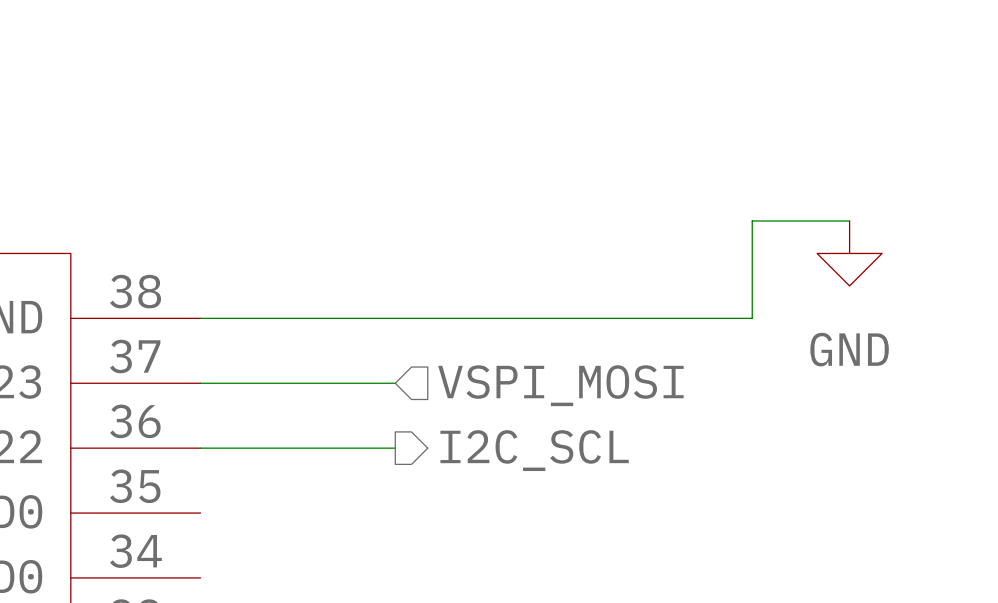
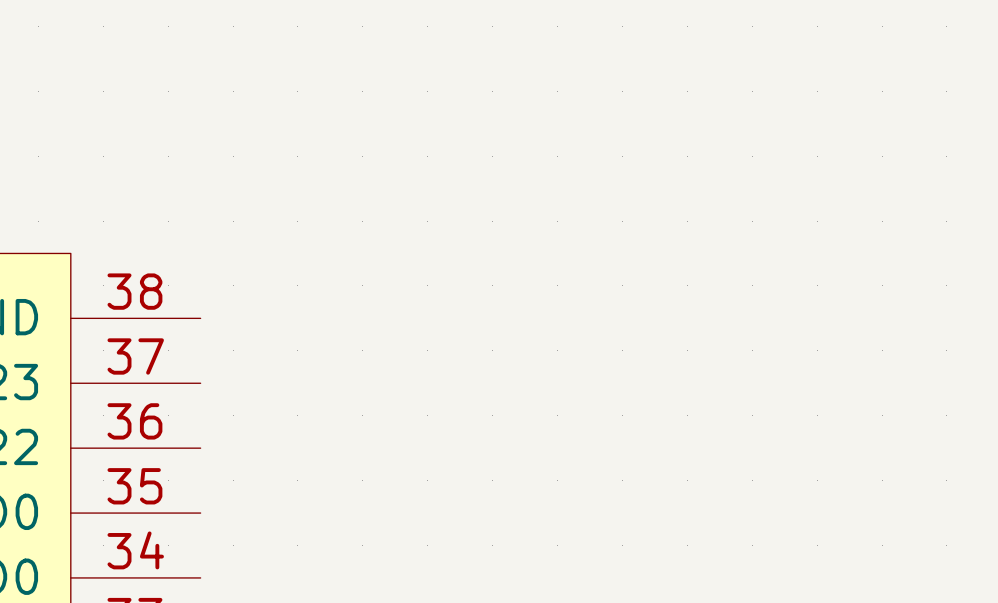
wire: (849, 221) (752, 221) (752, 318) (200, 318) -> none
power symbol: GND (849, 253) -> none
wire: (200, 383) (395, 383) -> none
hierarchical label: VSPI_MOSI (560, 385) -> none
wire: (200, 448) (395, 448) -> none
hierarchical label: I2C_SCL (534, 450) -> none

